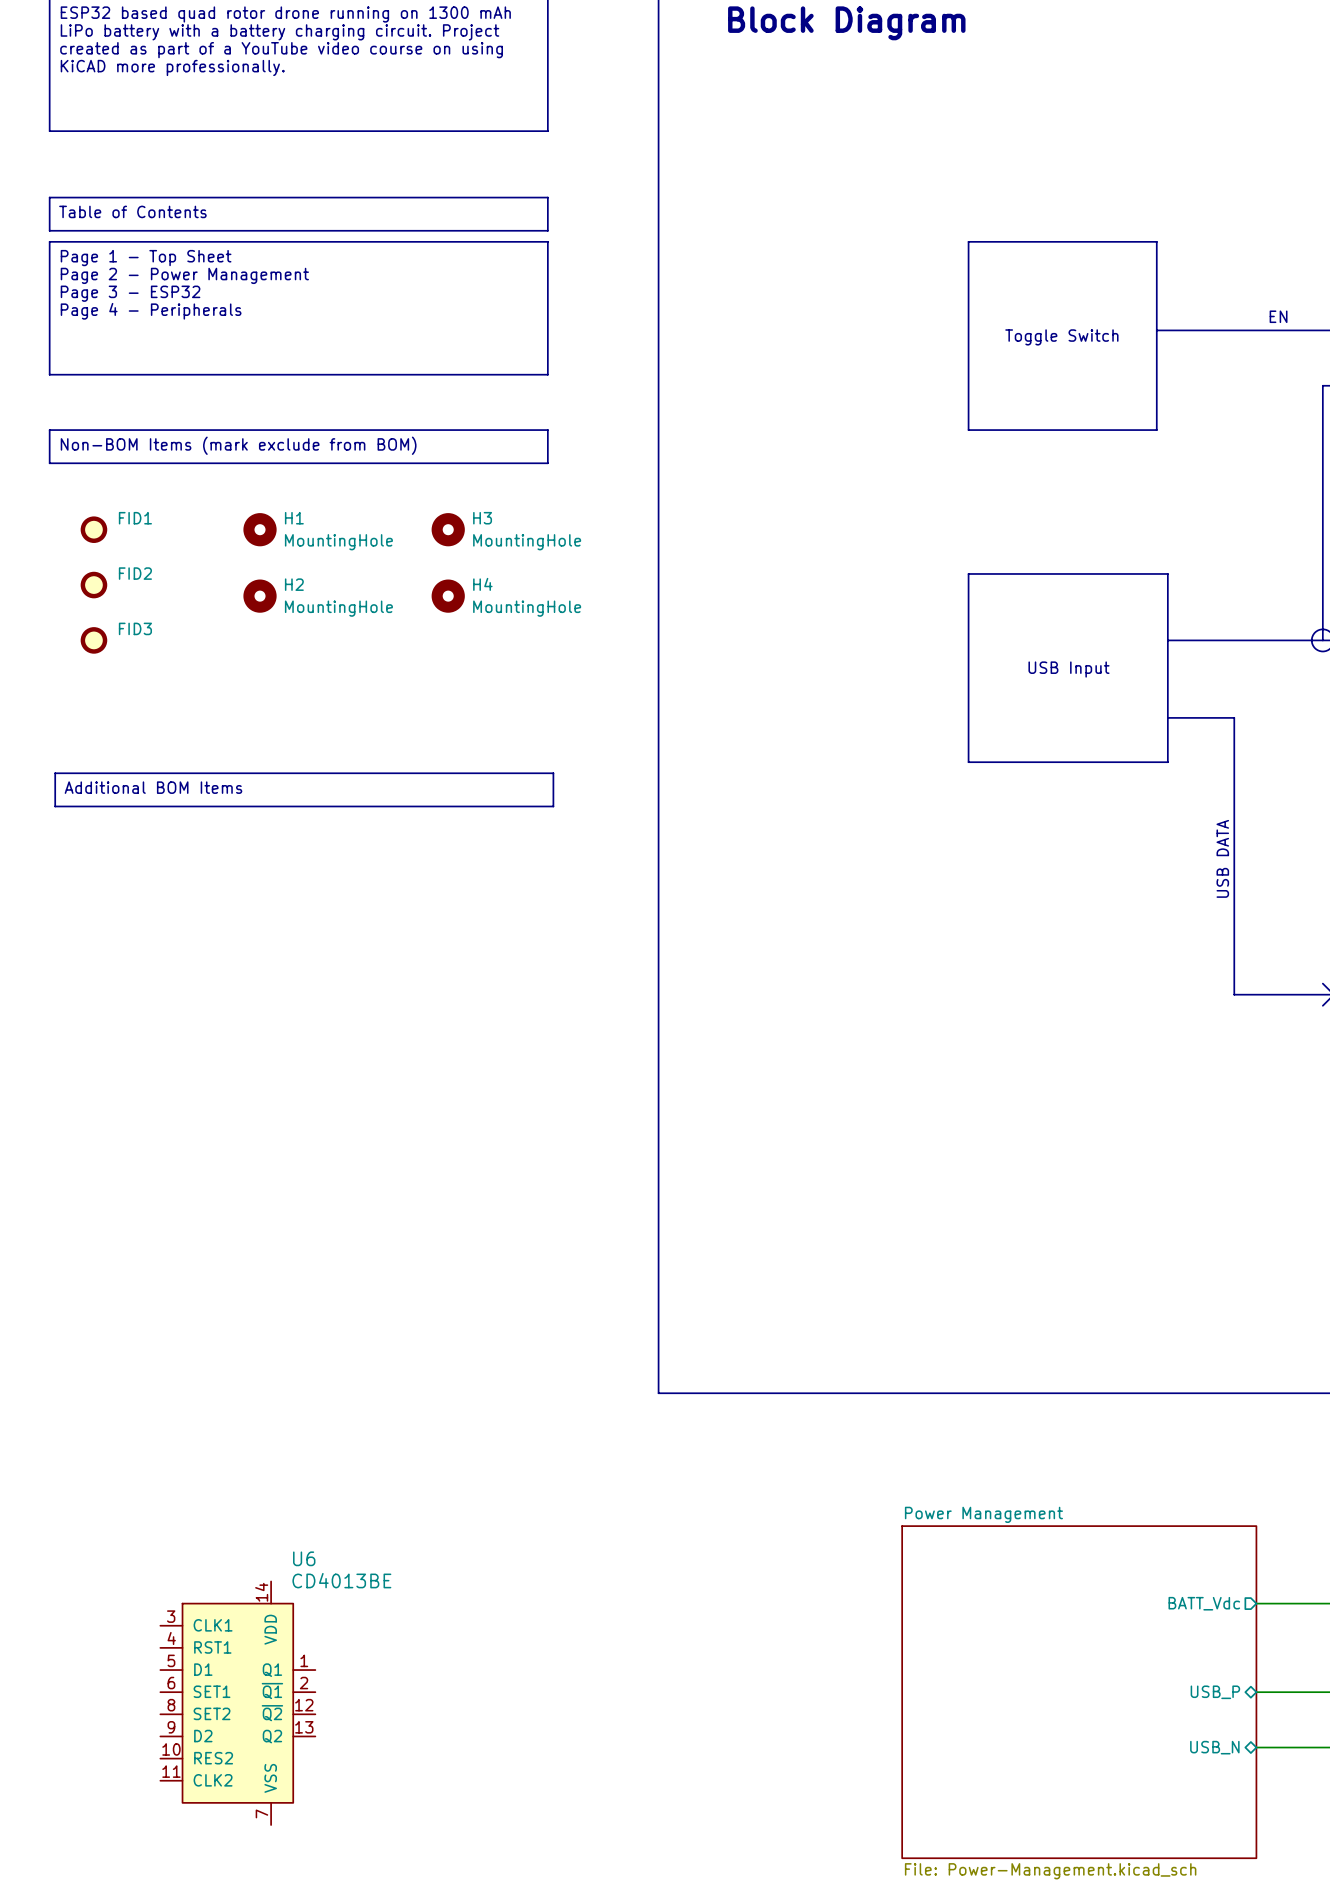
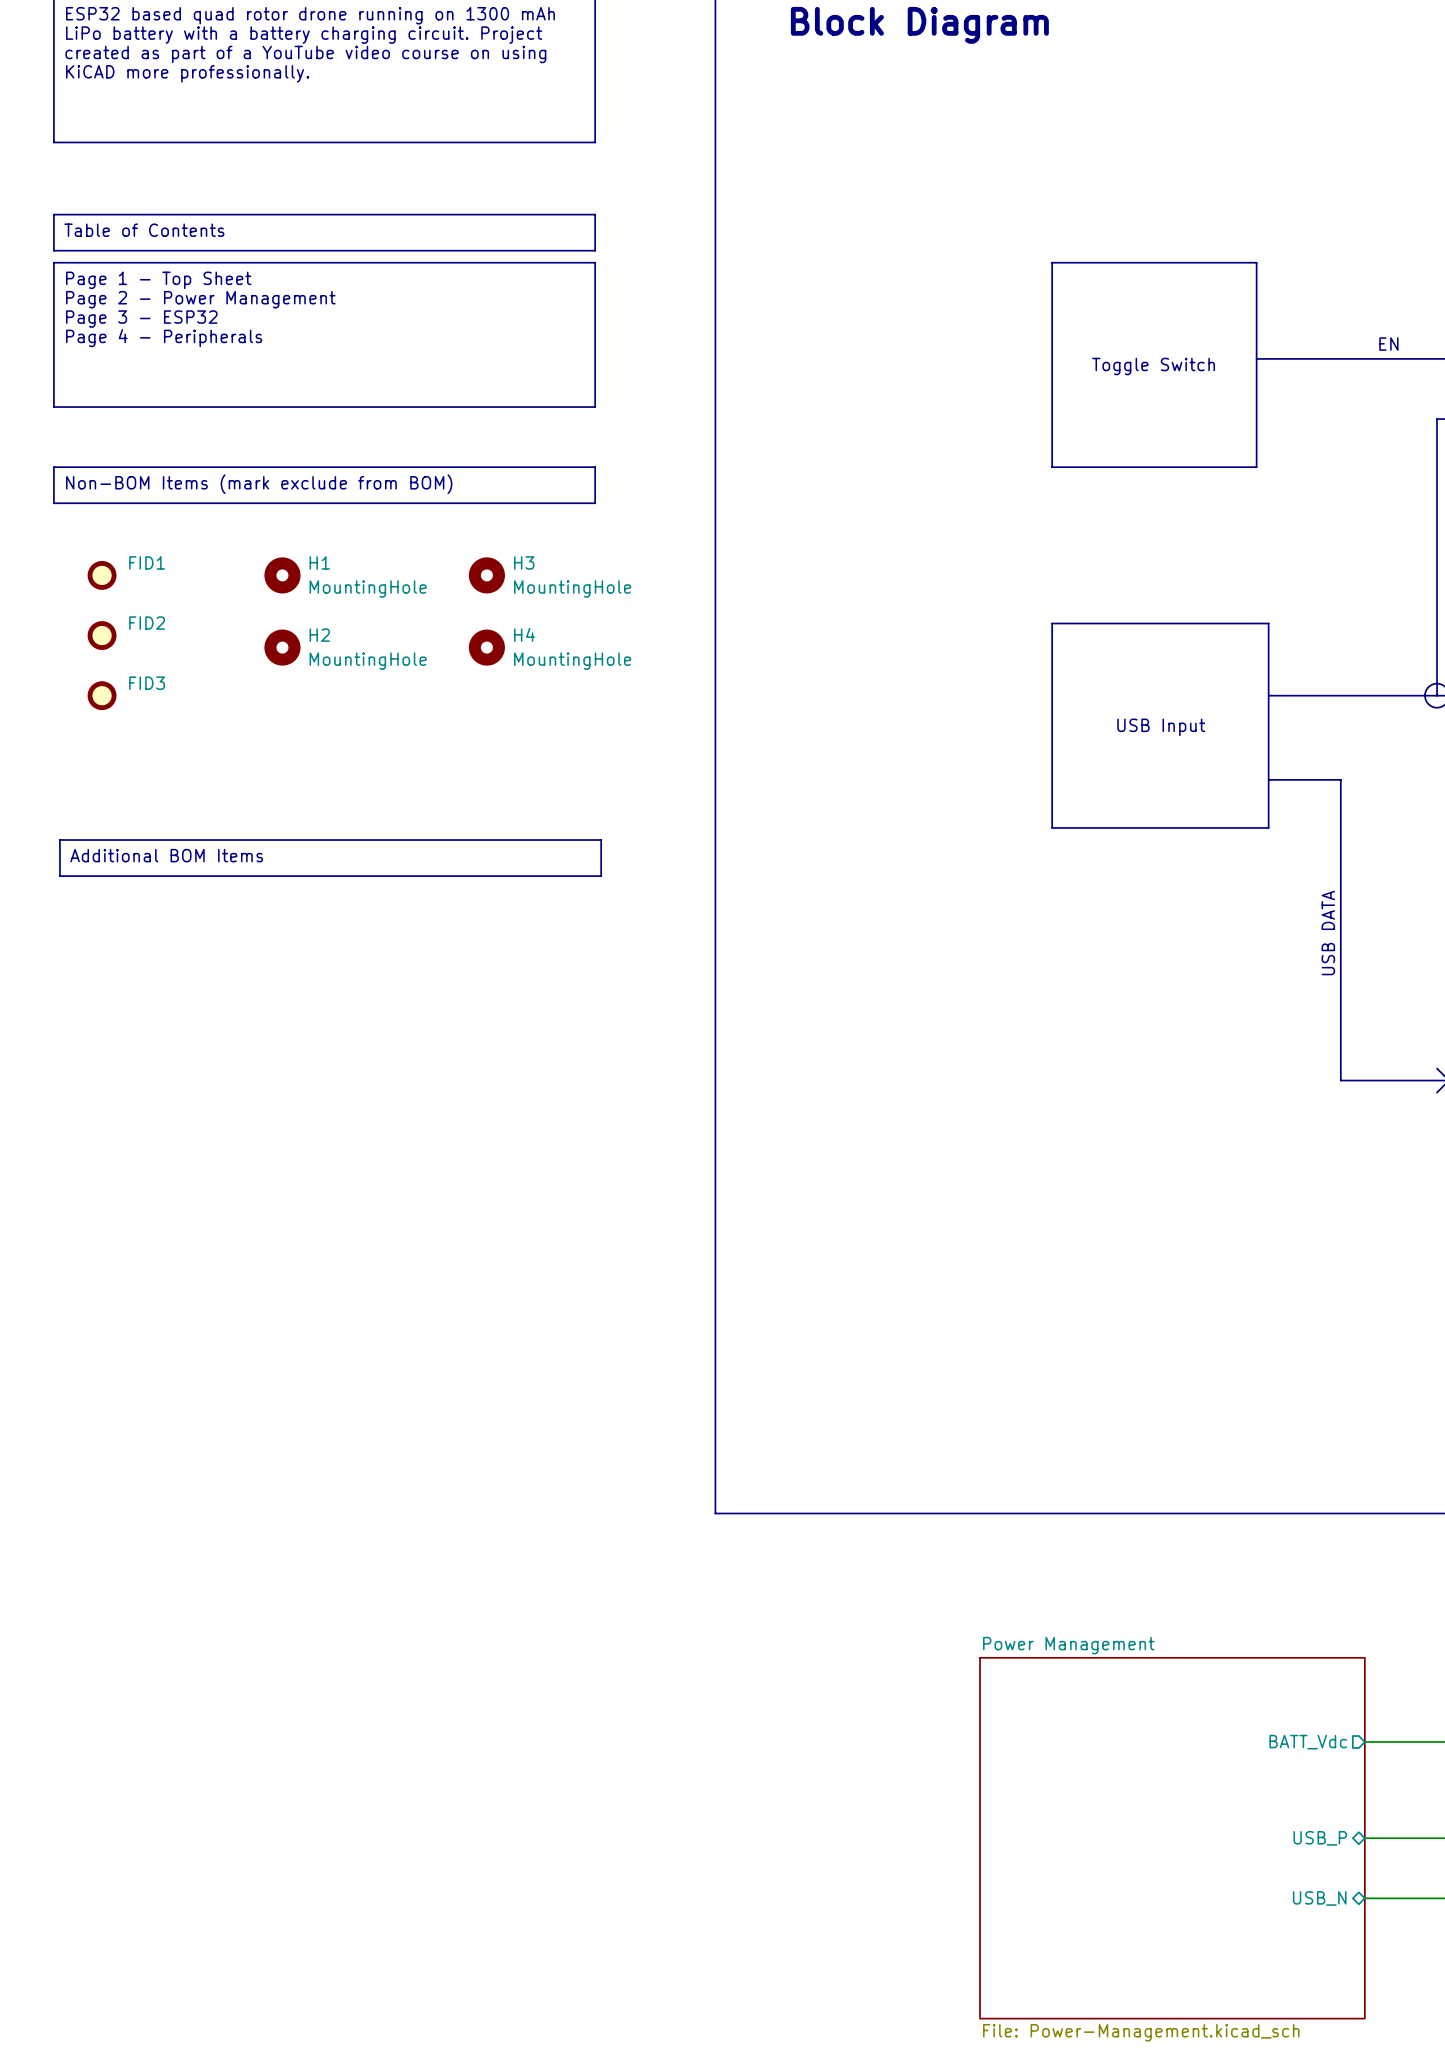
U6: CD4013BE (237, 1703) -> none

